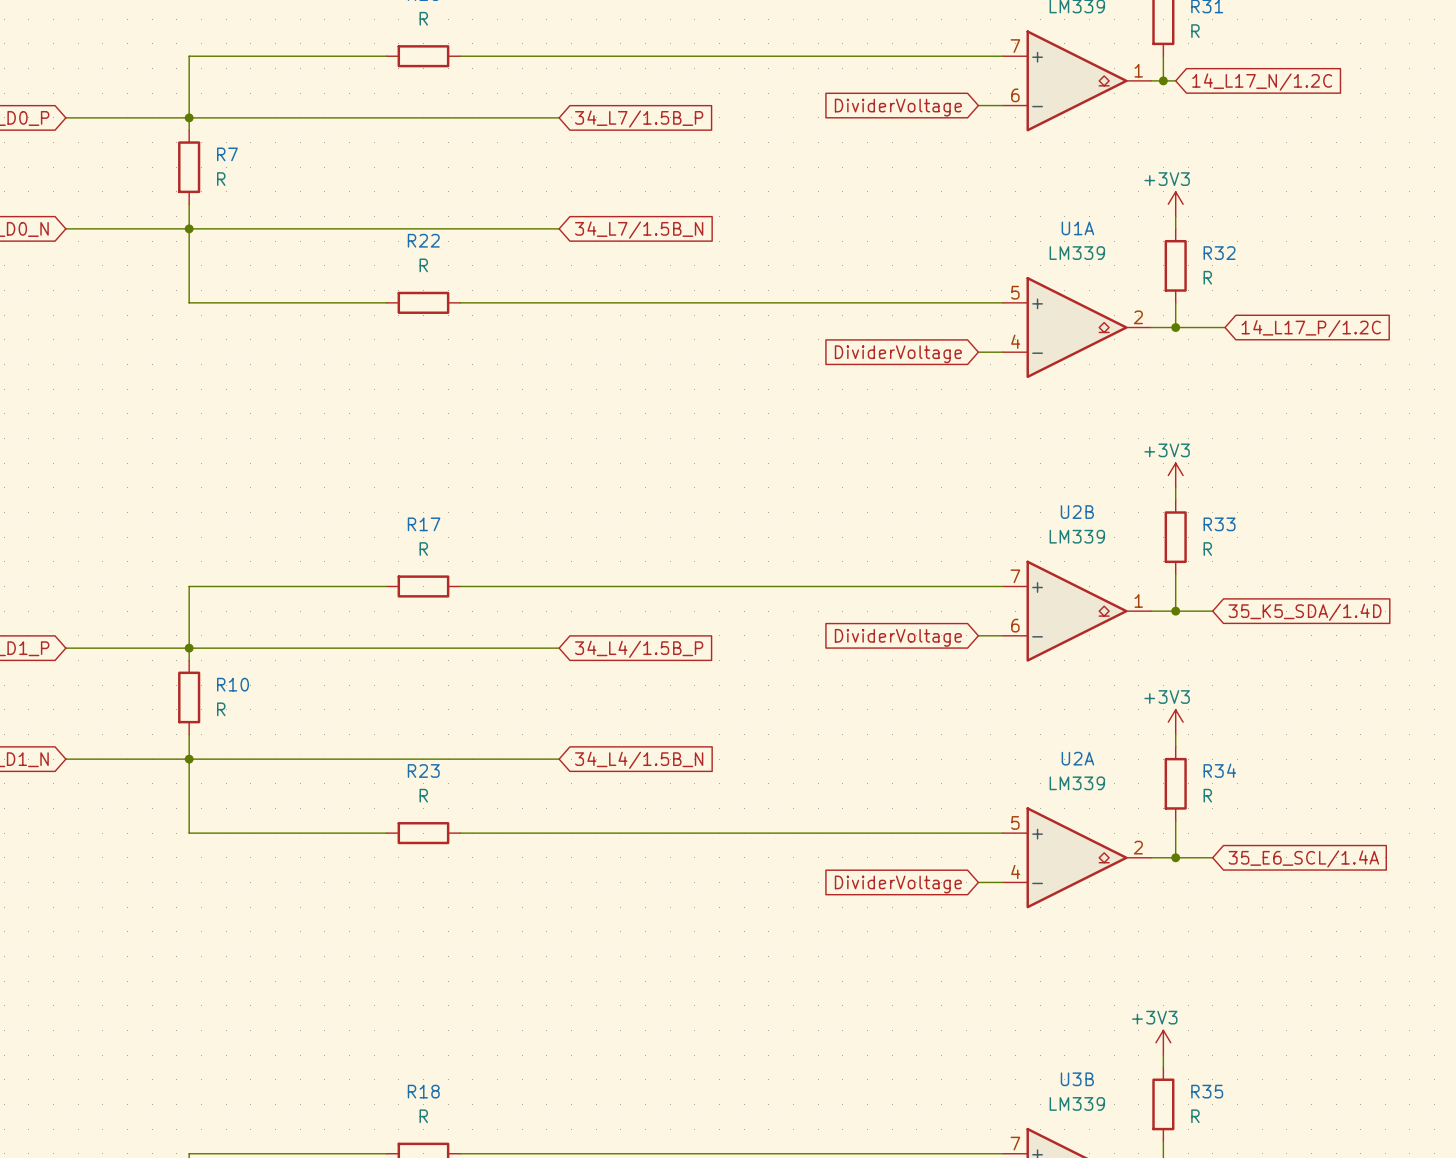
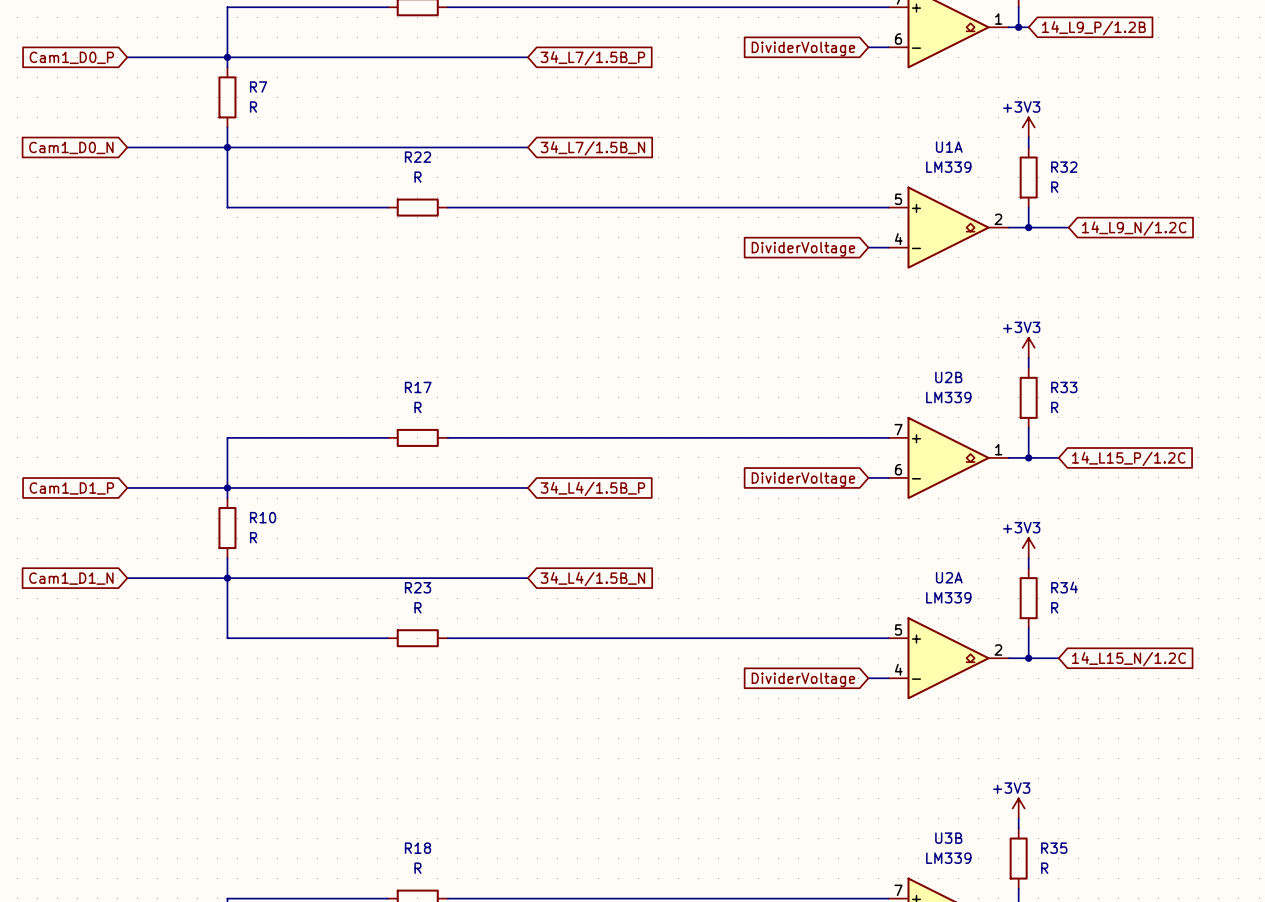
global label: 14_L17_N/1.2C (1262, 82) -> 14_L9_P/1.2B (1093, 28)
global label: 14_L17_P/1.2C (1311, 328) -> 14_L9_N/1.2C (1134, 228)
global label: 35_K5_SDA/1.4D (1305, 612) -> 14_L15_P/1.2C (1128, 458)
global label: 35_E6_SCL/1.4A (1303, 858) -> 14_L15_N/1.2C (1128, 659)

